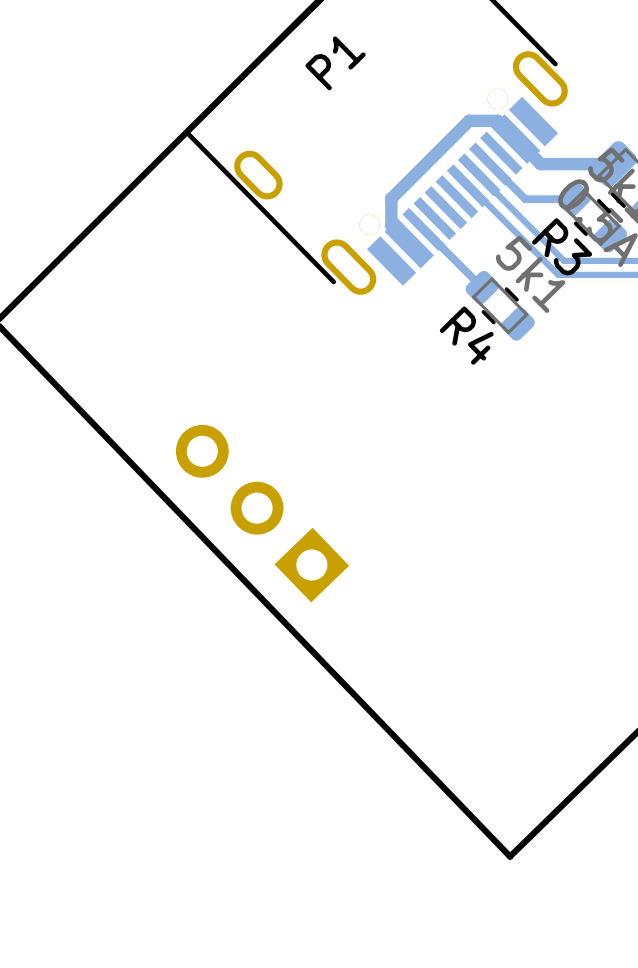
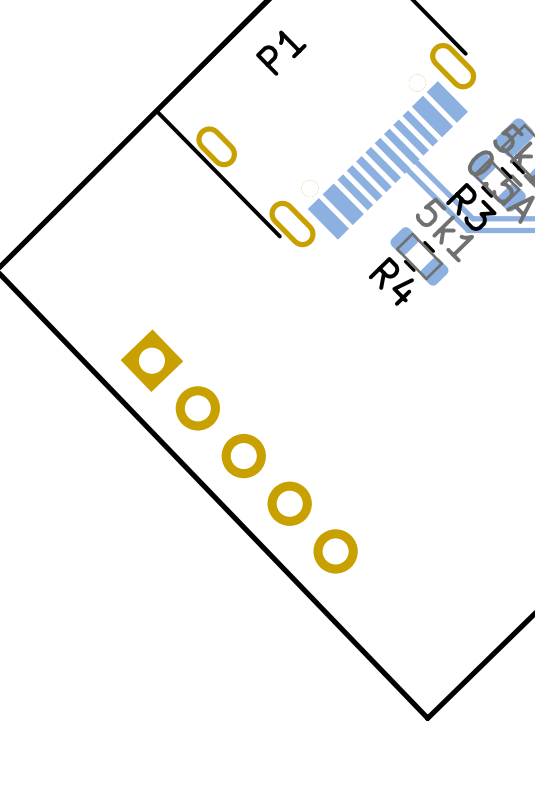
track: (490, 164) (525, 199) (574, 199) -> none
track: (613, 164) (540, 164) (497, 120) (469, 120) (391, 198) (391, 225) (409, 243) -> none
track: (424, 229) (482, 287) -> none
part: (262, 513) -> none
part: none -> (239, 451)

